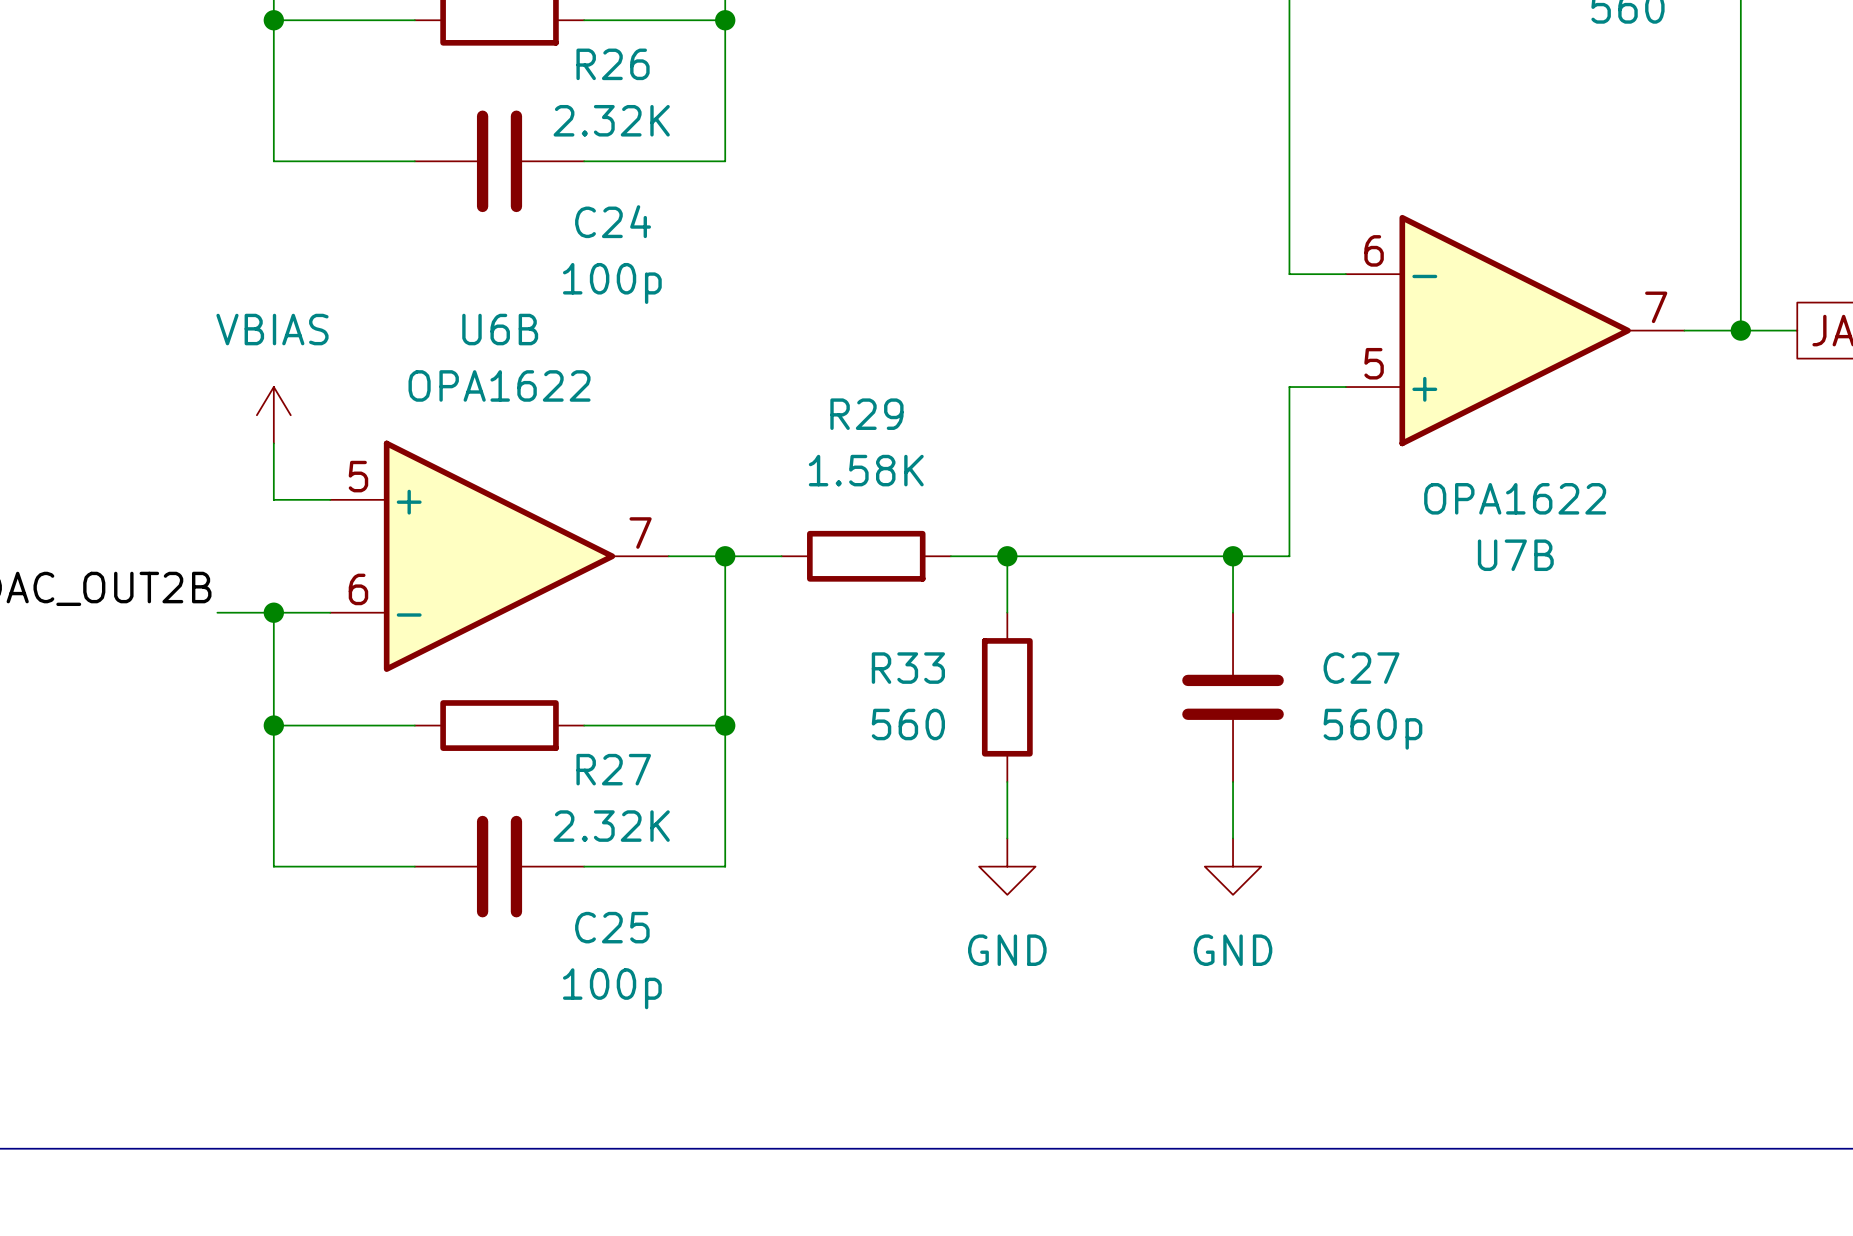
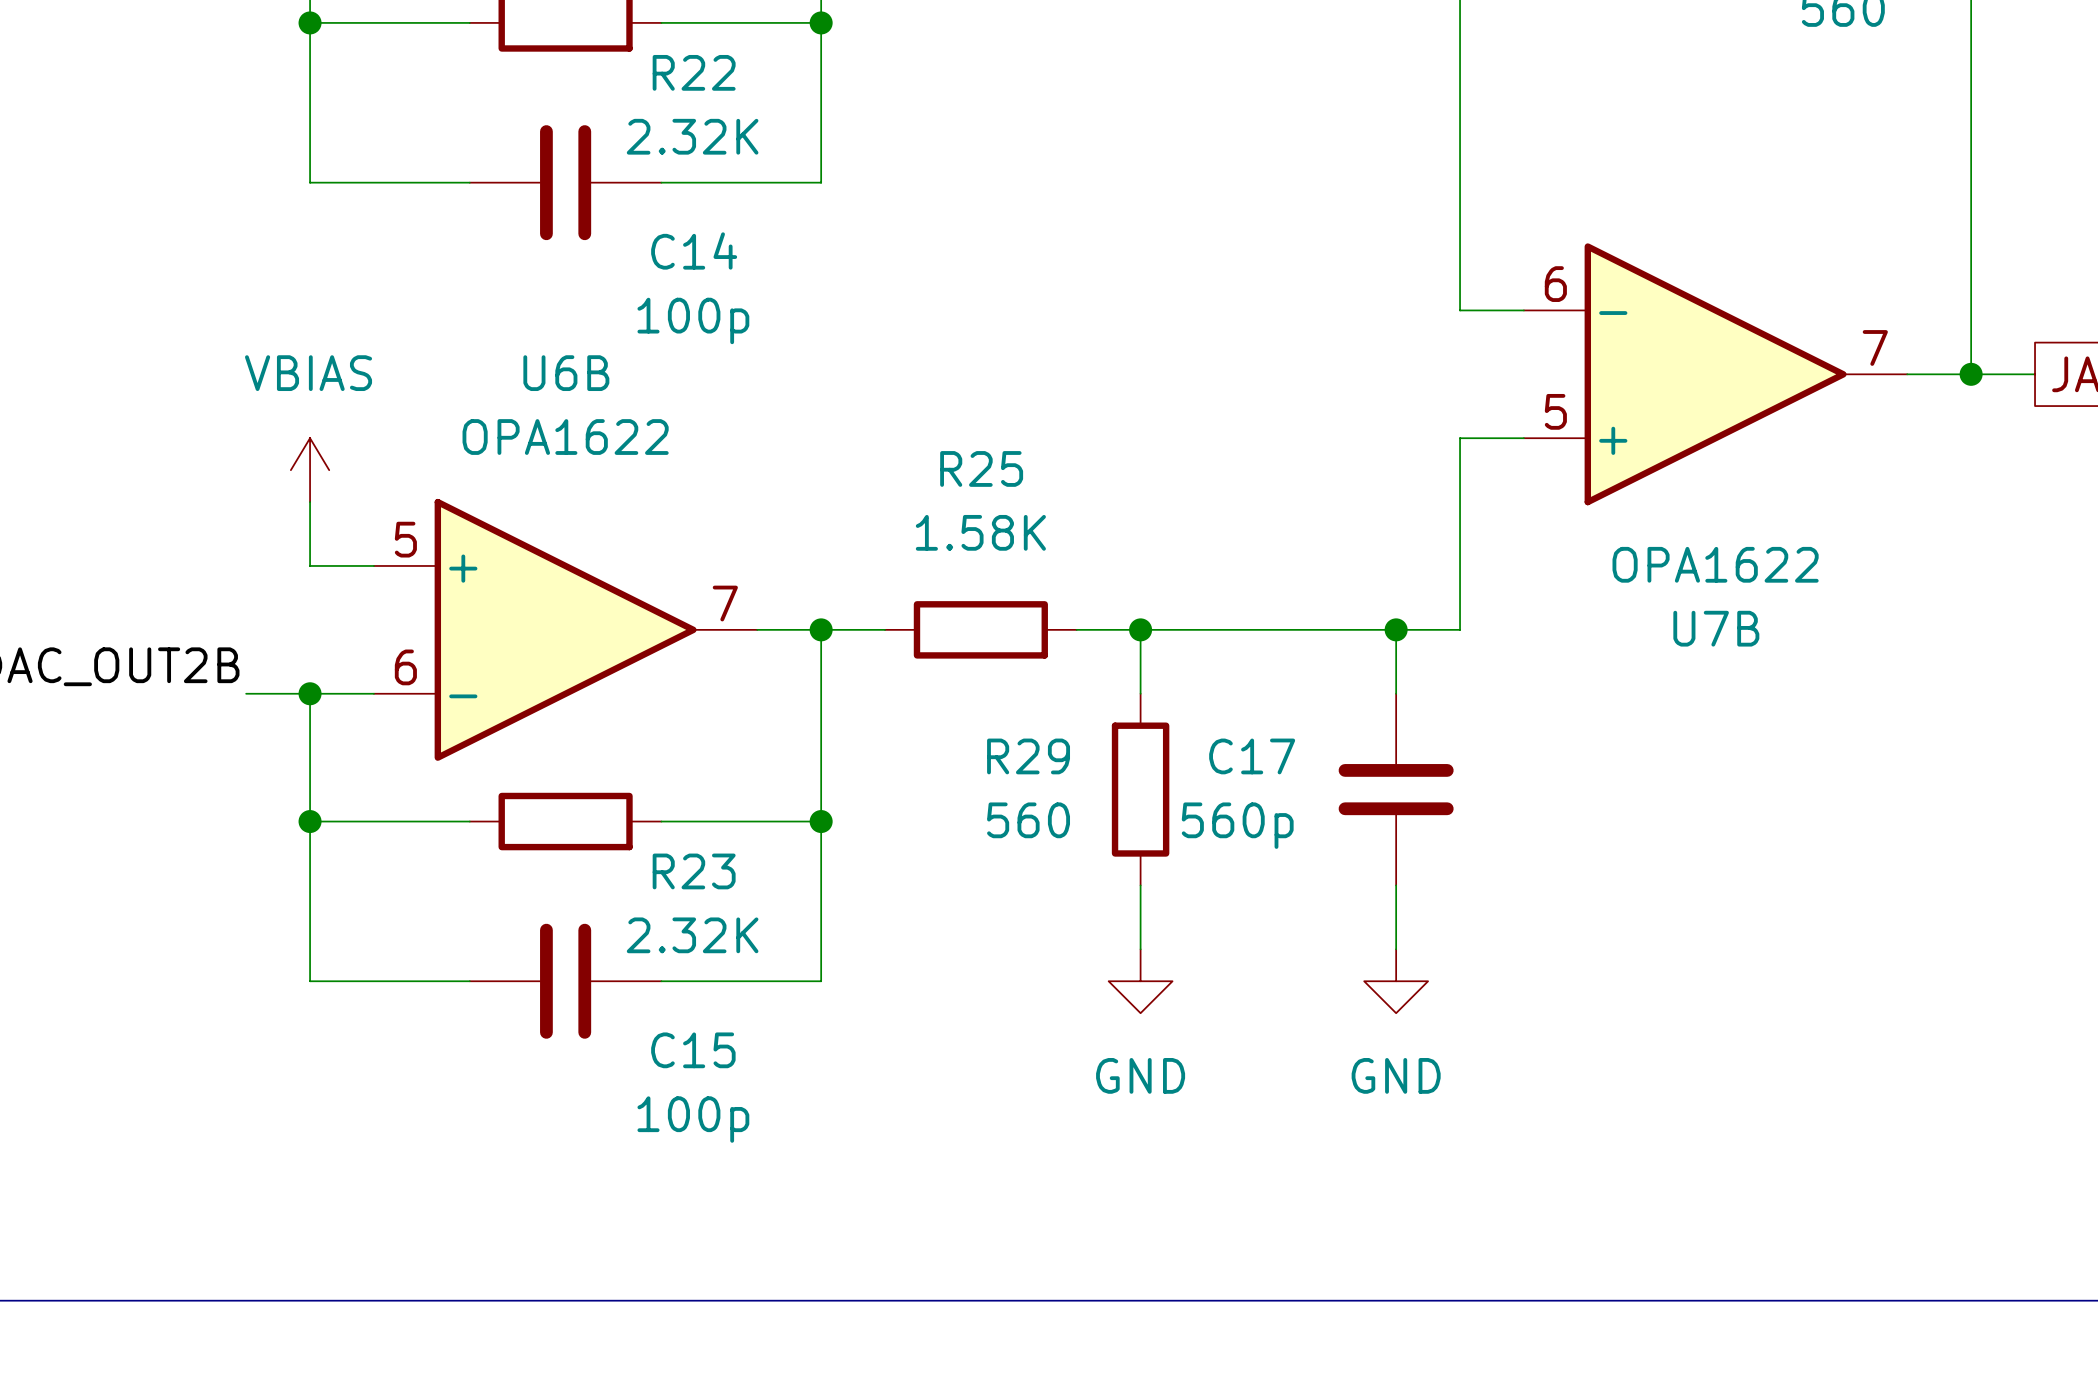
R26 name: R26 (613, 64) -> R22 (694, 72)
C24 name: C24 (613, 221) -> C14 (694, 250)
R29 name: R29 (866, 414) -> R25 (981, 468)
R33 name: R33 (908, 668) -> R29 (1028, 756)
C27 name: C27 (1361, 668) -> C17 (1252, 756)
C27 value position: 560p (1372, 729) -> 560p (1237, 825)
R27 name: R27 (613, 769) -> R23 (694, 871)
C25 name: C25 (612, 927) -> C15 (693, 1050)

